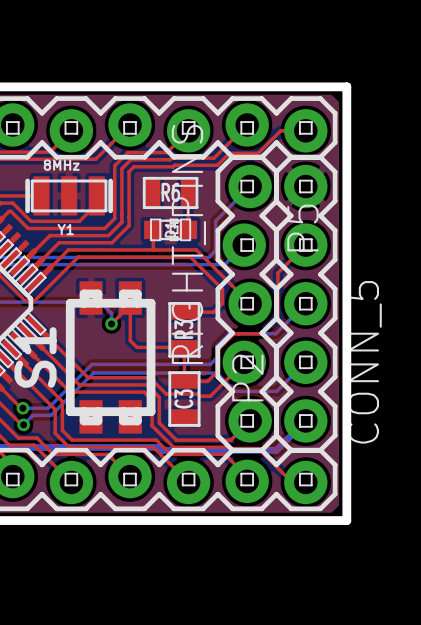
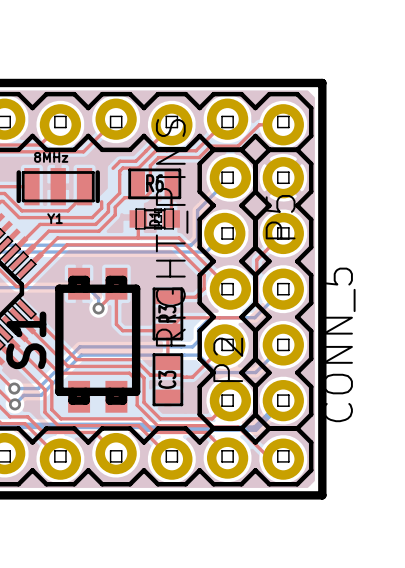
top track: (188, 130) (166, 152) (127, 152) (114, 165) (114, 211) -> (171, 125) (135, 161) (120, 161) (113, 168)
top track: (170, 159) (130, 159) (121, 168) (121, 214) -> (154, 152) (138, 168) (122, 168) (119, 171) (119, 193) (108, 204)
top track: (174, 165) (173, 166) (133, 166) (129, 171) (129, 217) -> (158, 157) (150, 165) (150, 192) (144, 197) (124, 197) (115, 207)
top track: (233, 333) (216, 351) (216, 372) (207, 381) (184, 381) -> (214, 317) (180, 317) (167, 330)

